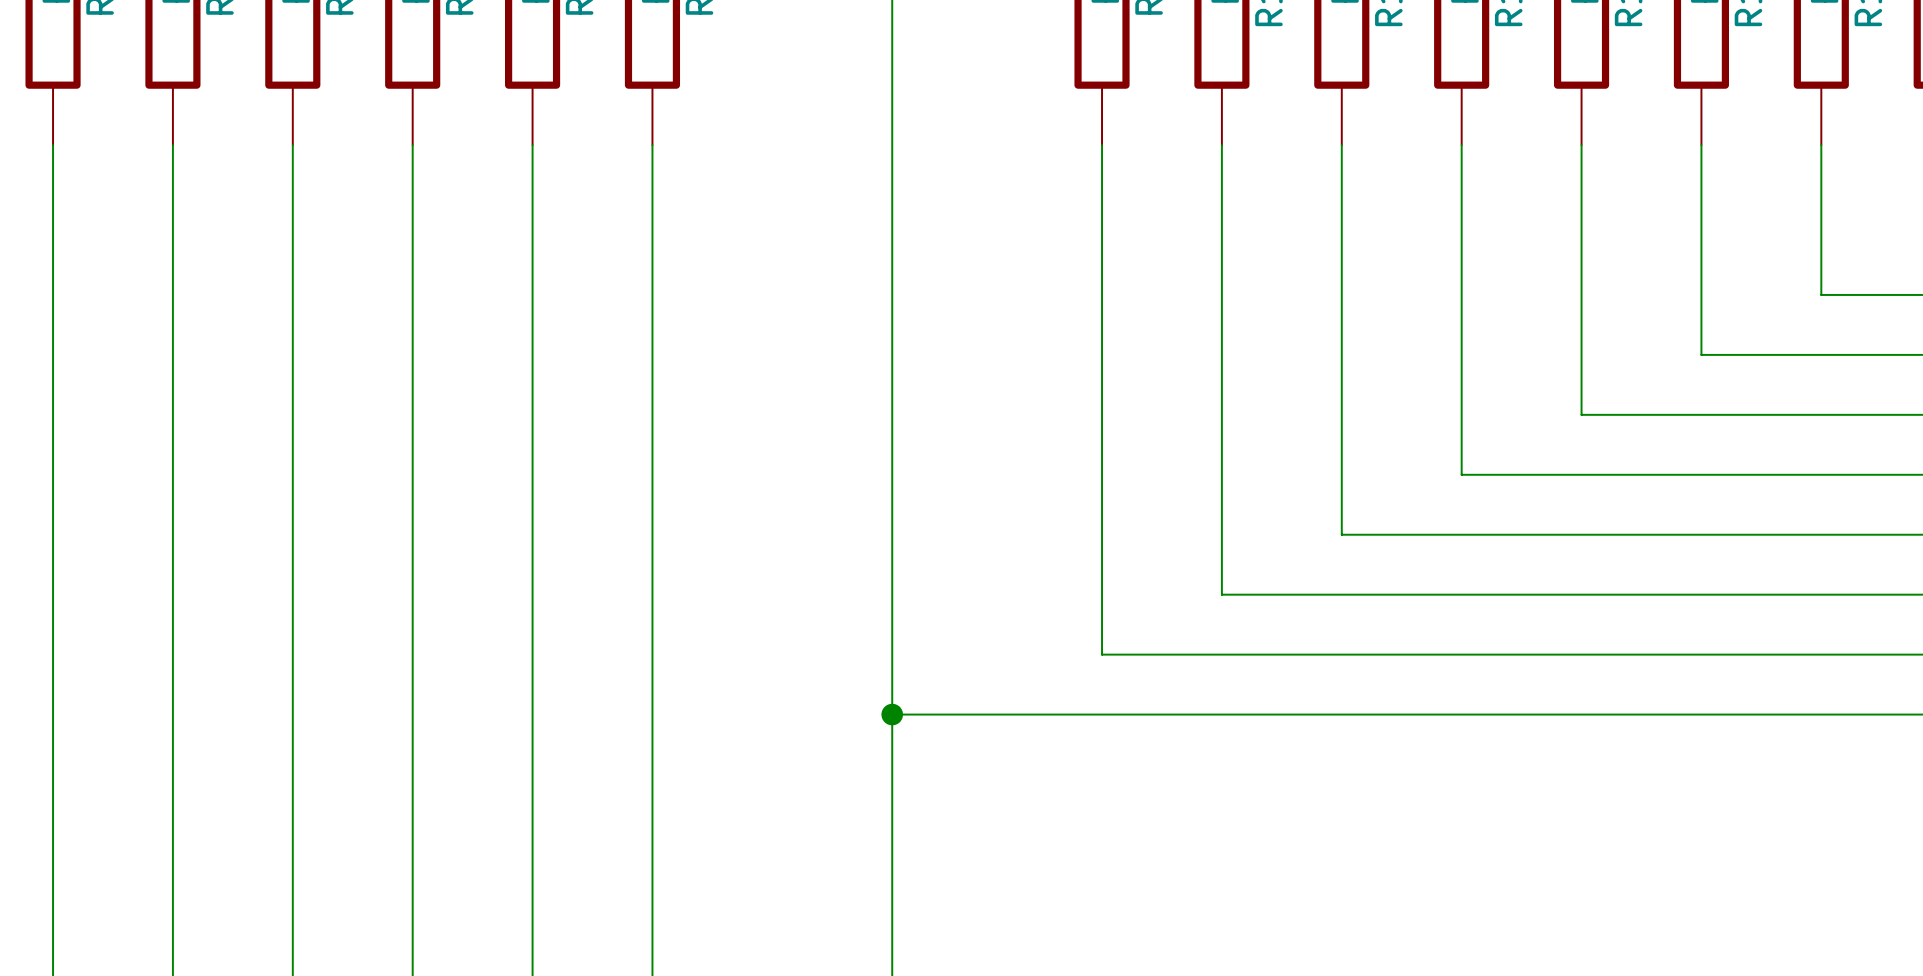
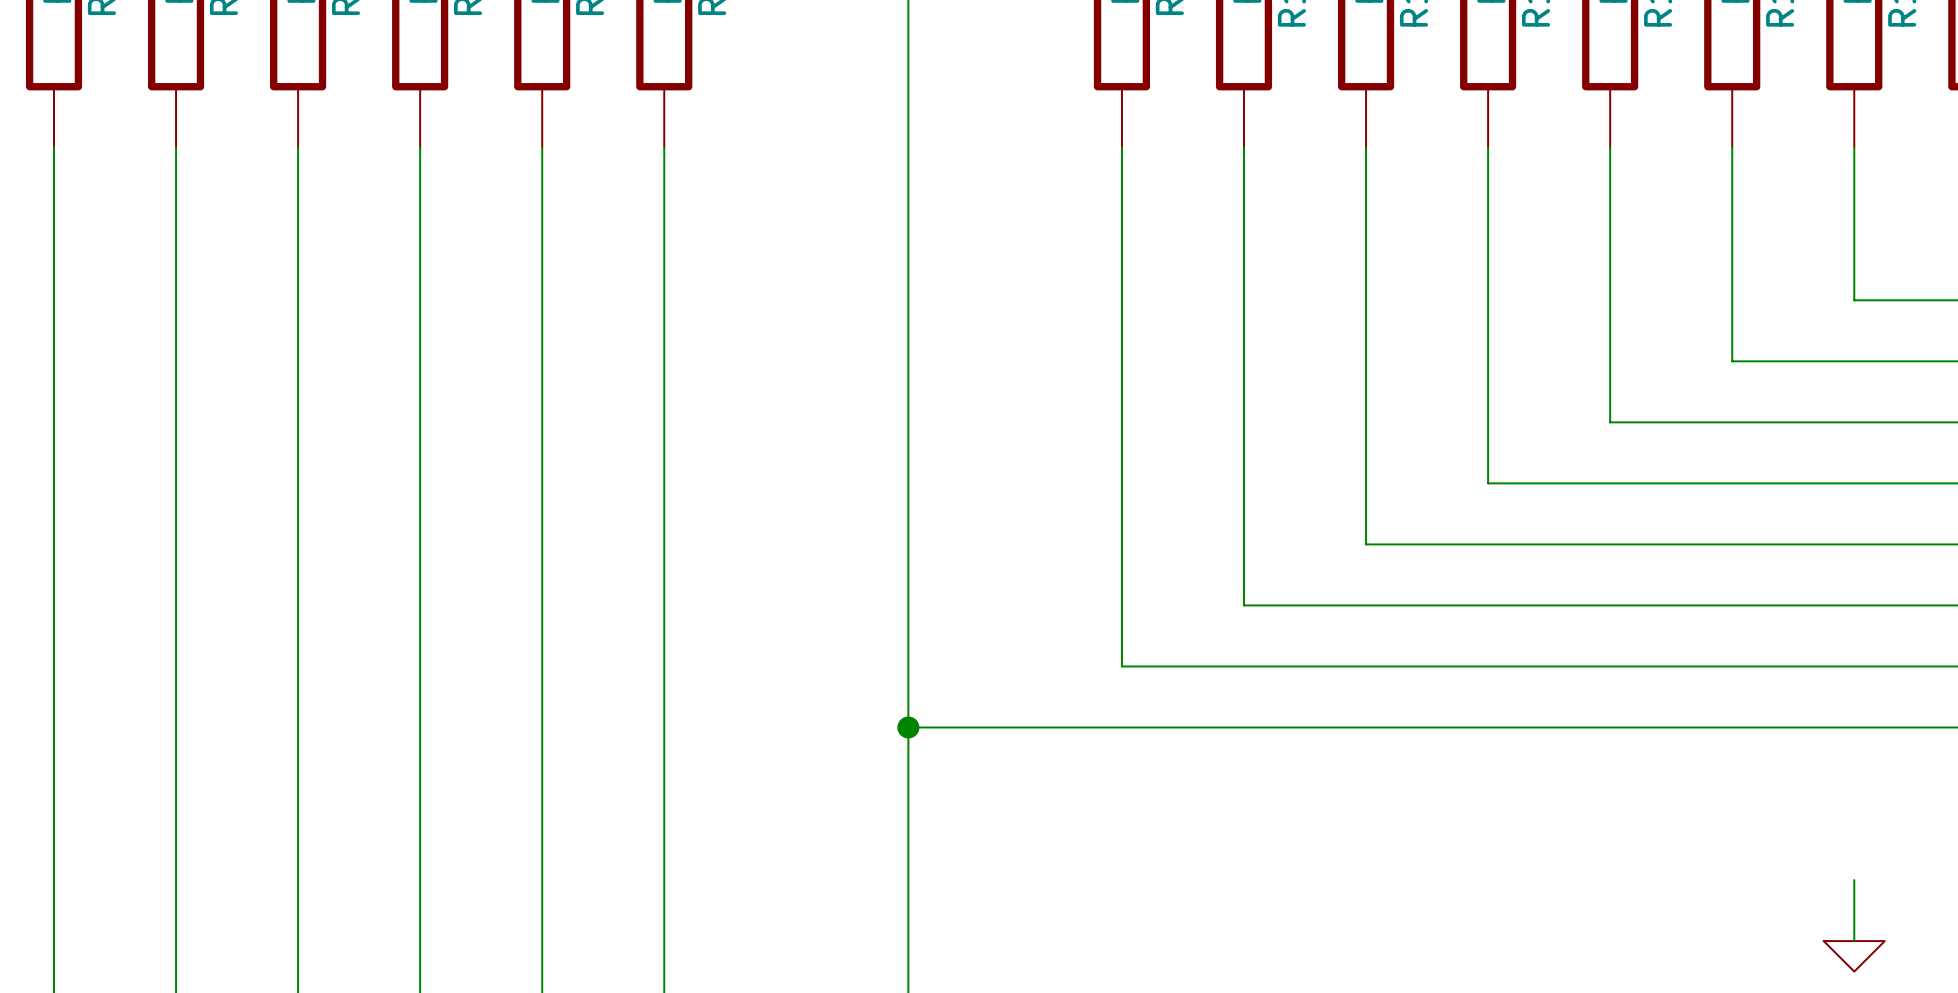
wire: none -> (1854, 880) (1854, 941)
power symbol: none -> (1854, 956)

